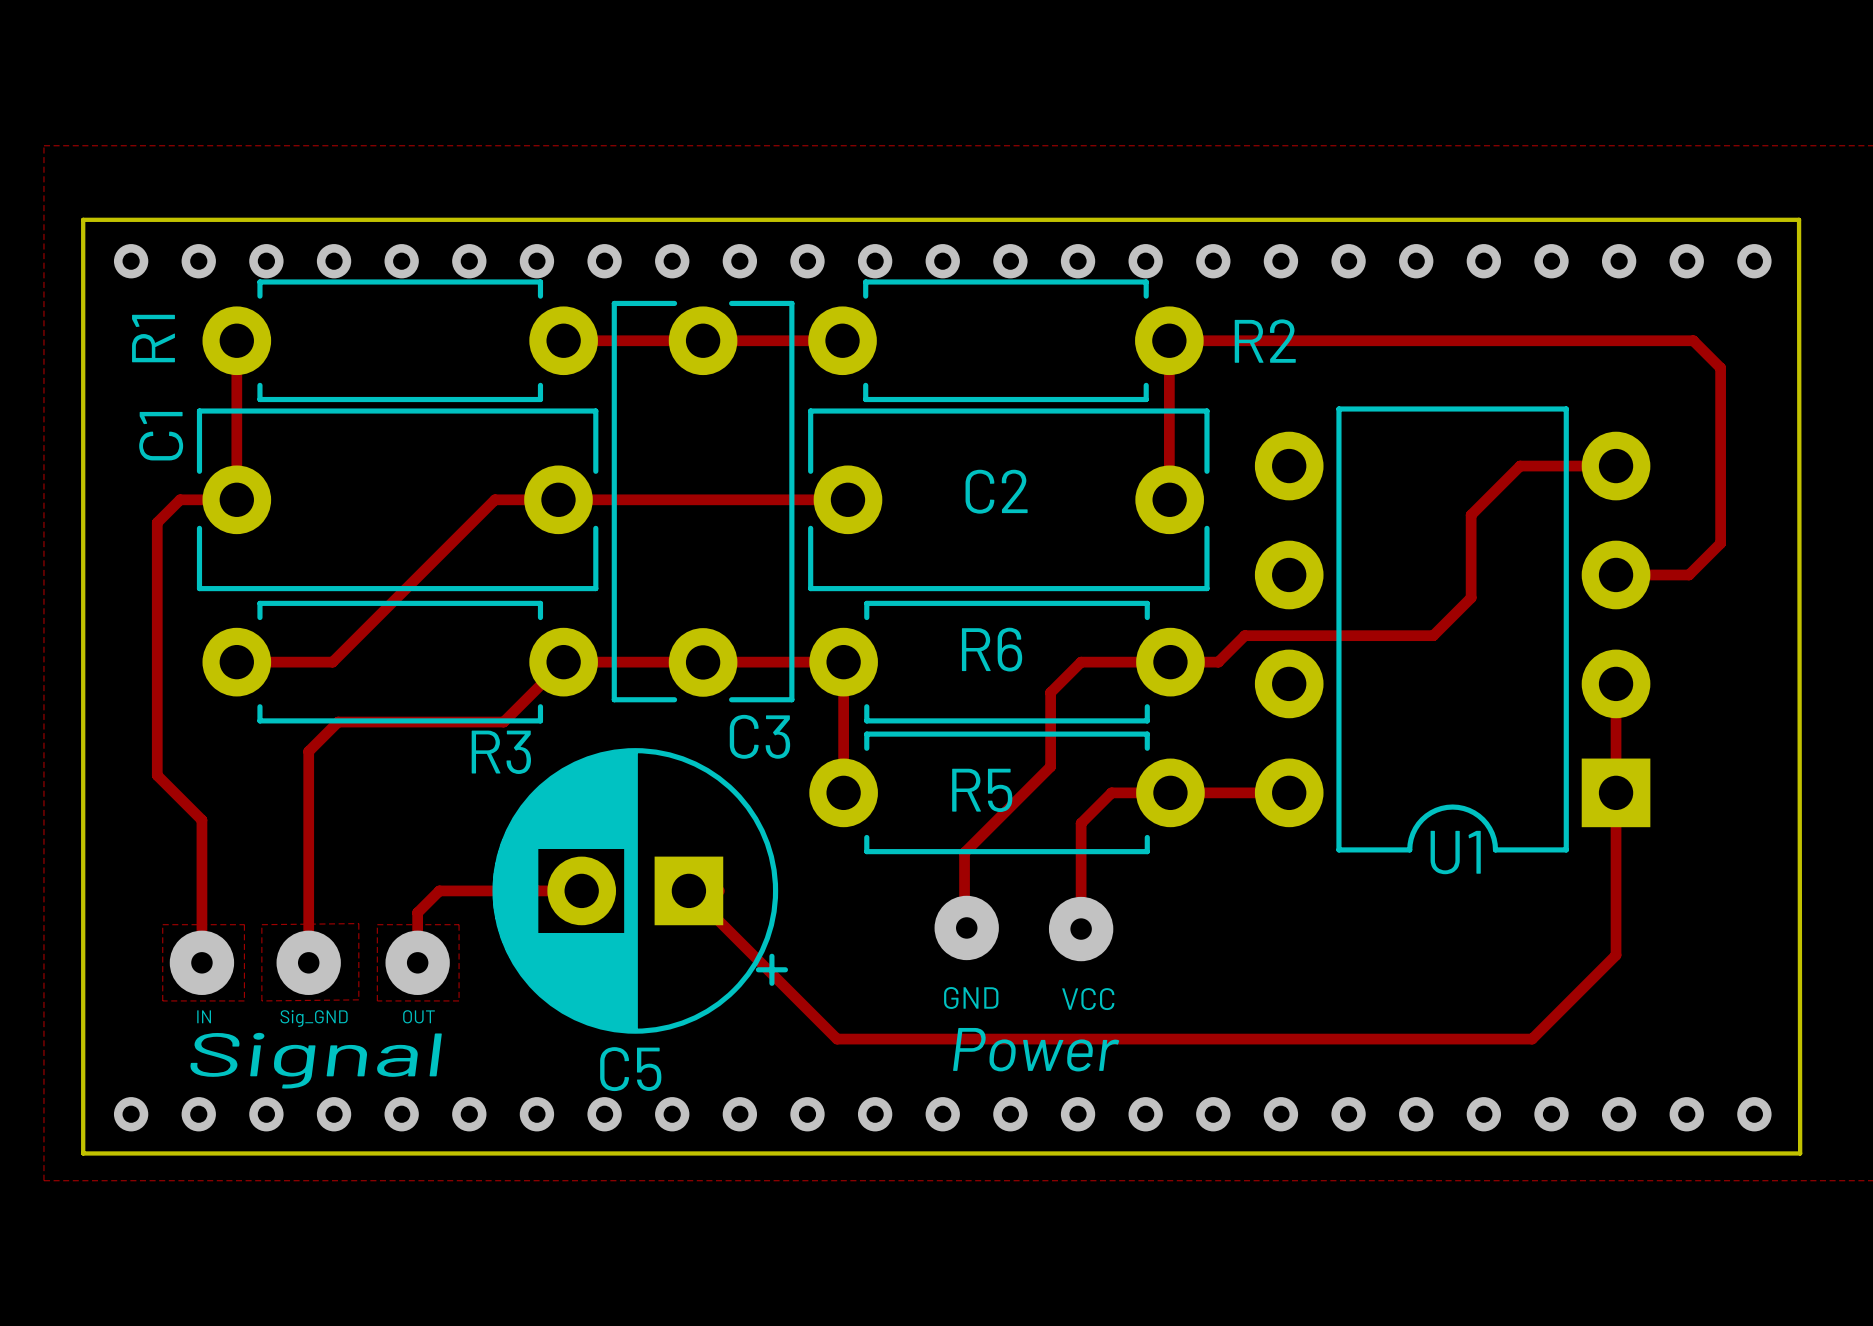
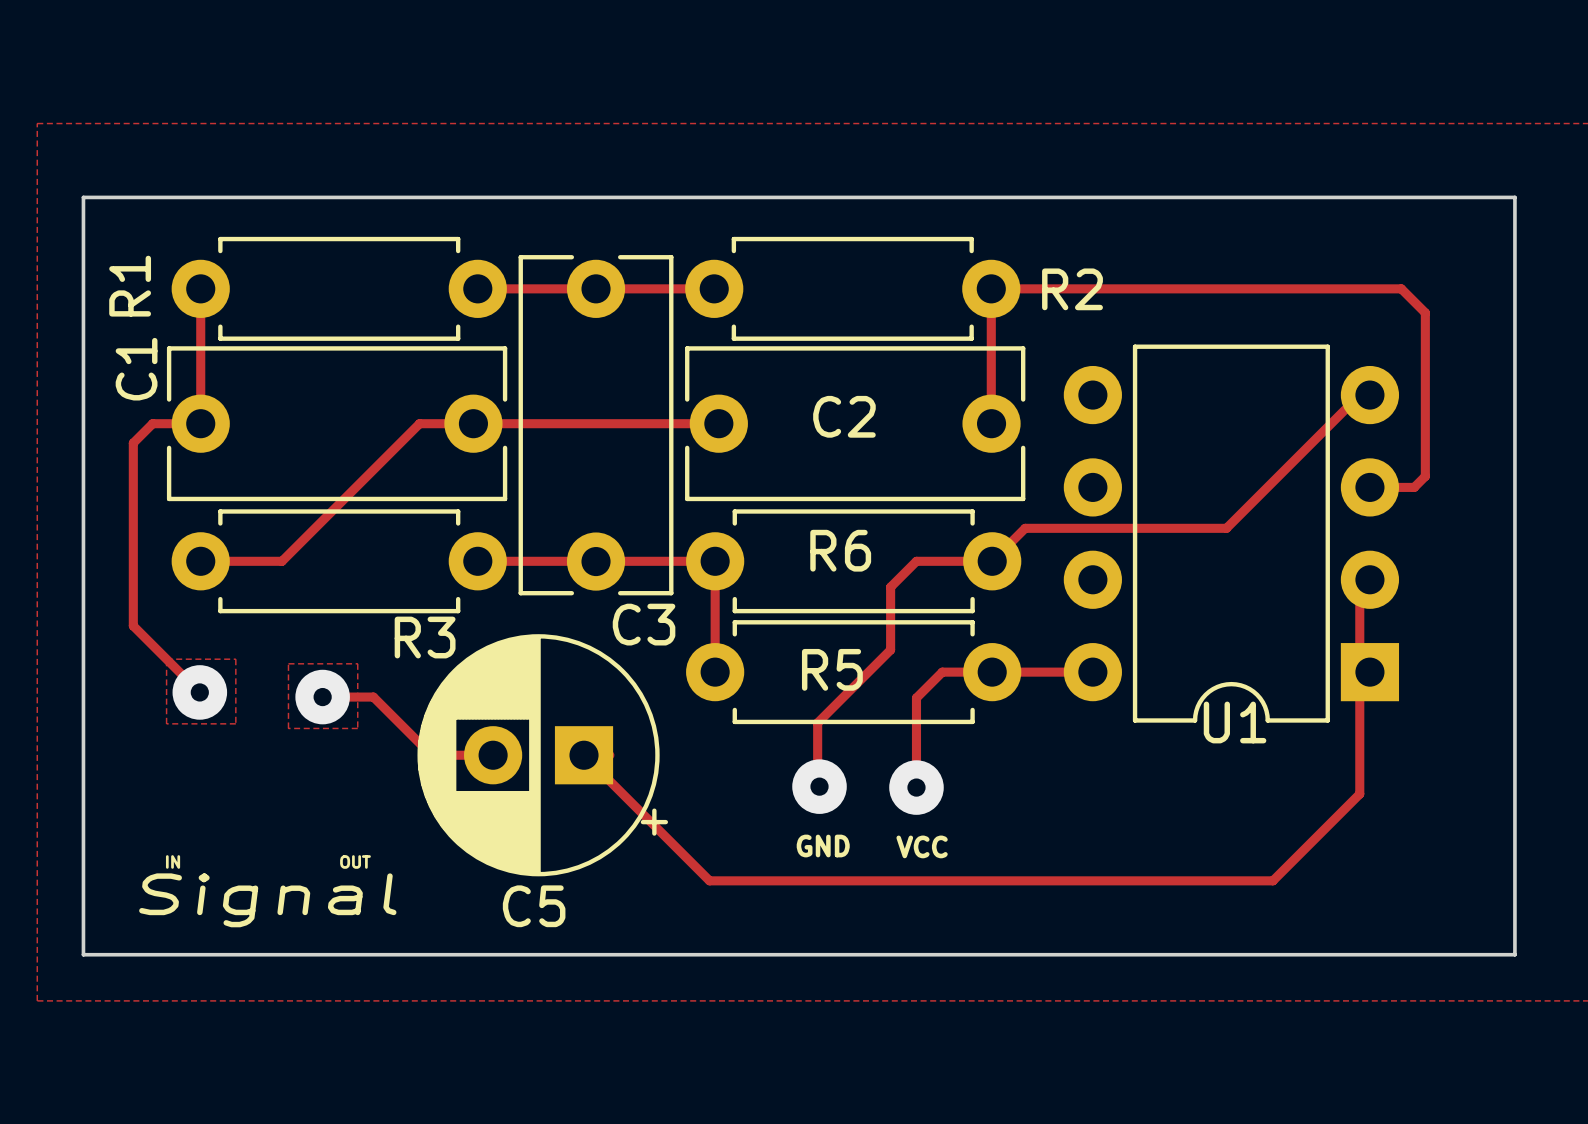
board edge: (83, 219) (1799, 219) (1800, 1153) (83, 1153) (83, 219) -> (83, 197) (83, 954) (1514, 954) (1514, 197) (83, 197)
via: (131, 261) -> none
via: (198, 261) -> none
via: (266, 261) -> none
via: (334, 261) -> none
via: (401, 261) -> none
via: (469, 261) -> none
via: (536, 261) -> none
via: (604, 261) -> none
via: (672, 261) -> none
via: (739, 261) -> none
via: (807, 261) -> none
via: (875, 261) -> none
via: (942, 261) -> none
via: (1010, 261) -> none
via: (1078, 261) -> none
via: (1145, 261) -> none
via: (1213, 261) -> none
via: (1280, 261) -> none
via: (1348, 261) -> none
via: (1416, 261) -> none
via: (1483, 261) -> none
via: (1551, 261) -> none
via: (1619, 261) -> none
via: (1686, 261) -> none
via: (1754, 261) -> none
track: (1653, 340) (1693, 340) (1720, 367) (1720, 543) (1689, 574) (1668, 574) -> (1401, 288) (1425, 312) (1425, 476) (1414, 487)
track: (1616, 466) (1520, 466) (1471, 515) (1471, 597) (1433, 635) (1244, 635) (1218, 662) (1170, 662) -> (1359, 395) (1226, 528) (1025, 528) (992, 561)
track: (563, 662) (503, 722) (338, 722) (308, 751) (308, 962) -> none
track: (1616, 683) (1616, 955) (1532, 1039) (1501, 1039) -> (1359, 579) (1359, 794) (1272, 880)
track: (157, 738) (157, 775) (201, 820) (201, 962) (194, 955) -> (133, 625) (199, 692)
via: none -> (199, 692)
via: none -> (322, 697)
track: (509, 890) (439, 890) (417, 912) (417, 962) -> (431, 755) (373, 697) (322, 697)
zone outline: (358, 923) (261, 924) (261, 1000) (358, 999) (358, 923) -> none
zone outline: (162, 924) (162, 1000) (244, 1000) (244, 924) (162, 924) -> (166, 659) (166, 723) (235, 723) (235, 659) (166, 659)
zone outline: (377, 924) (459, 924) (459, 1000) (377, 1000) (377, 924) -> (288, 663) (357, 663) (357, 728) (288, 728) (288, 663)
via: (201, 962) -> none
via: (308, 962) -> none
via: (417, 962) -> none
text: Sig_GND (314, 1018) -> none
text: Power (1036, 1049) -> none
via: (131, 1114) -> none
via: (198, 1114) -> none
via: (266, 1114) -> none
via: (334, 1114) -> none
via: (401, 1114) -> none
via: (469, 1114) -> none
via: (536, 1114) -> none
via: (604, 1114) -> none
via: (672, 1114) -> none
via: (739, 1114) -> none
via: (807, 1114) -> none
via: (875, 1114) -> none
via: (942, 1114) -> none
via: (1010, 1114) -> none
via: (1078, 1114) -> none
via: (1145, 1114) -> none
via: (1213, 1114) -> none
via: (1280, 1114) -> none
via: (1348, 1114) -> none
via: (1416, 1114) -> none
via: (1483, 1114) -> none
via: (1551, 1114) -> none
via: (1619, 1114) -> none
via: (1686, 1114) -> none
via: (1754, 1114) -> none

